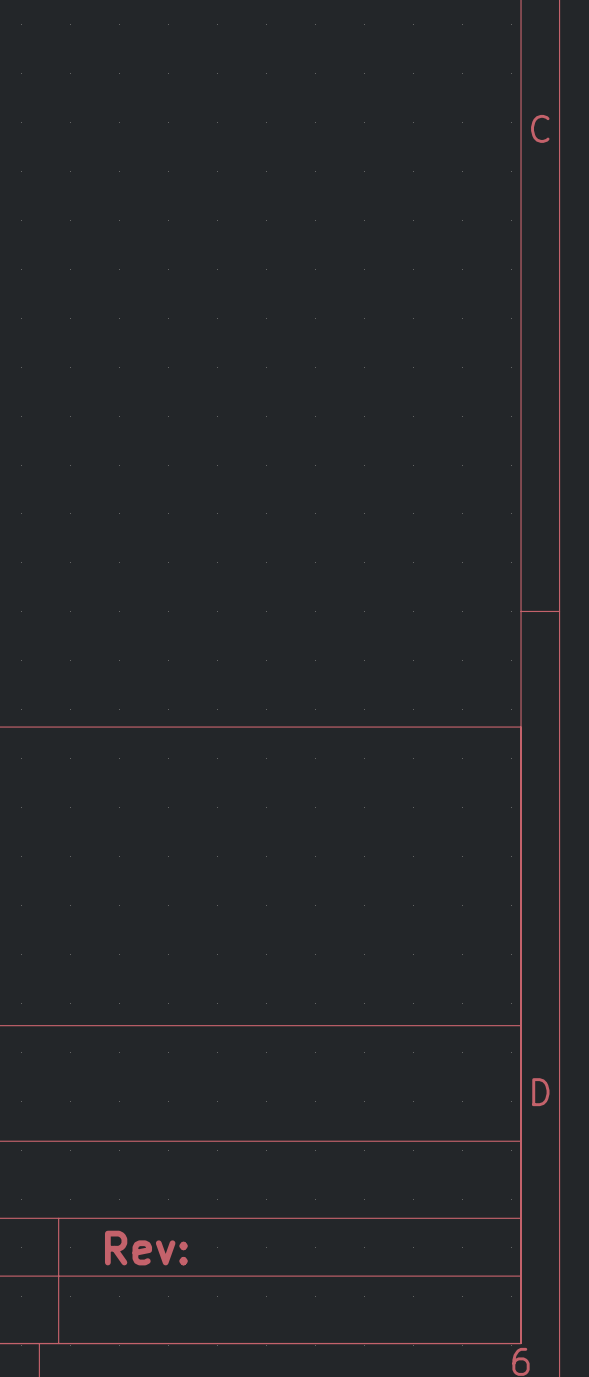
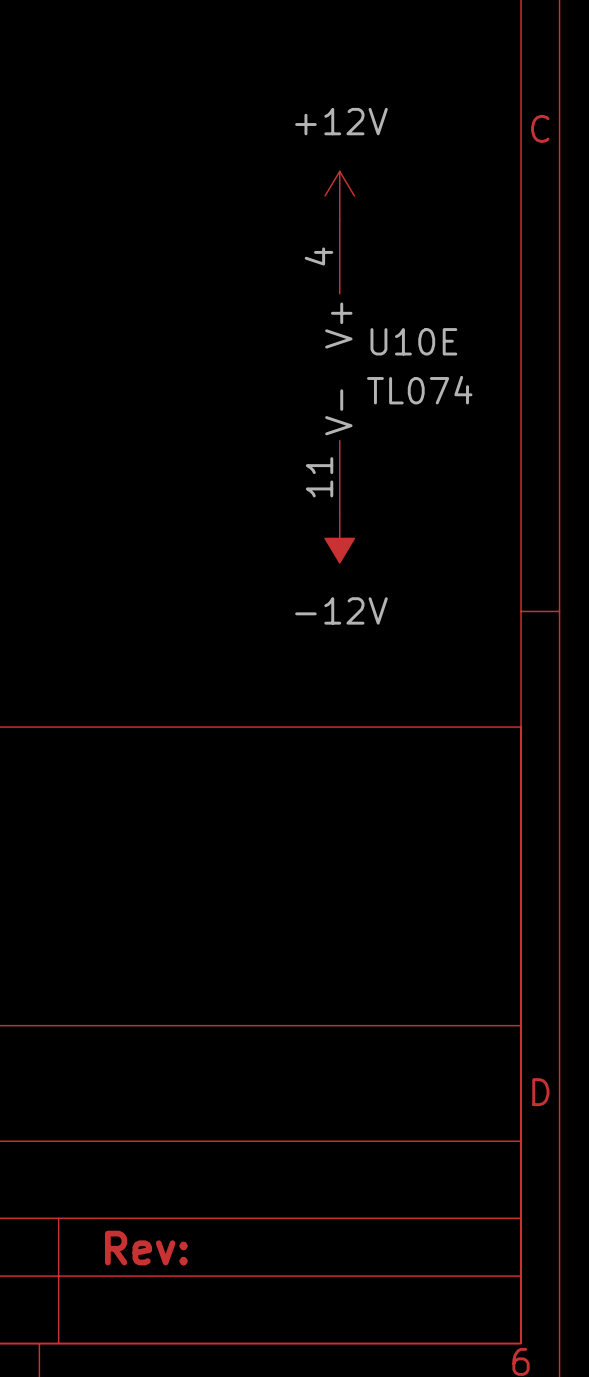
power symbol: none -> +12V (339, 195)
U10E: none -> TL074 (339, 367)
power symbol: none -> -12V (339, 538)

